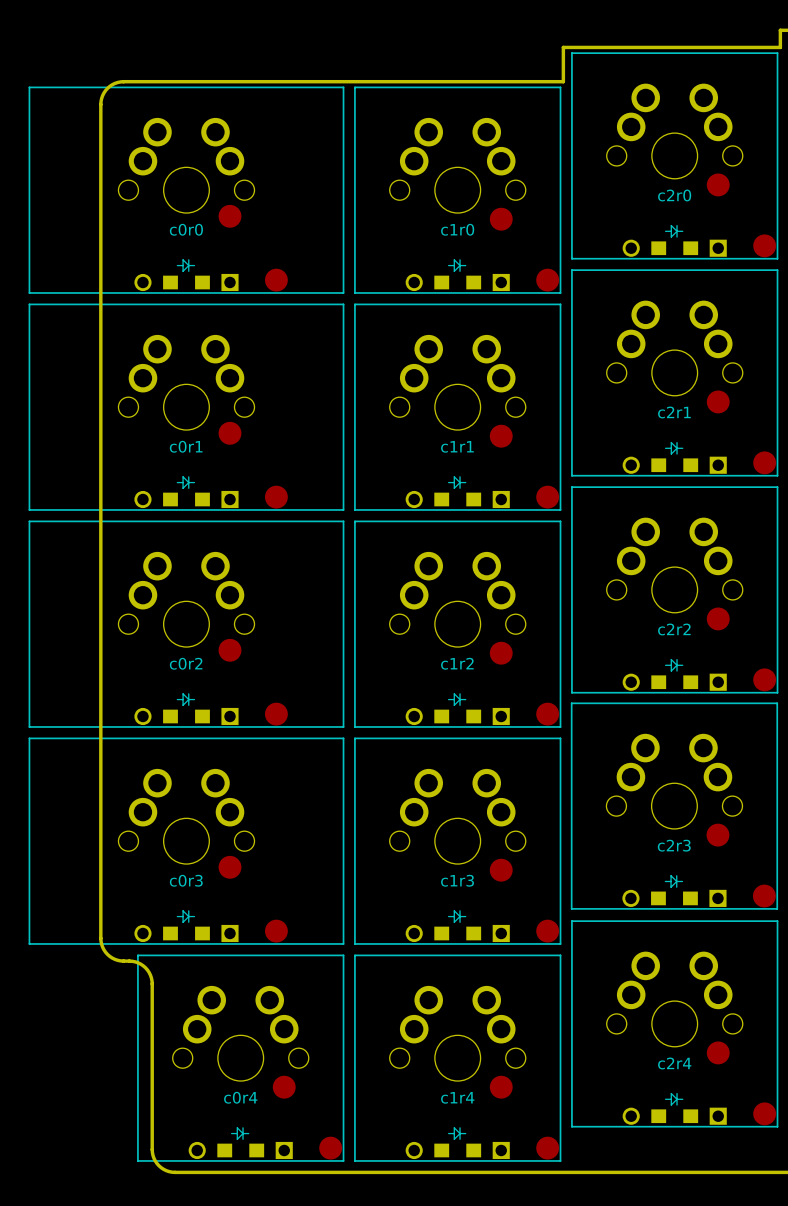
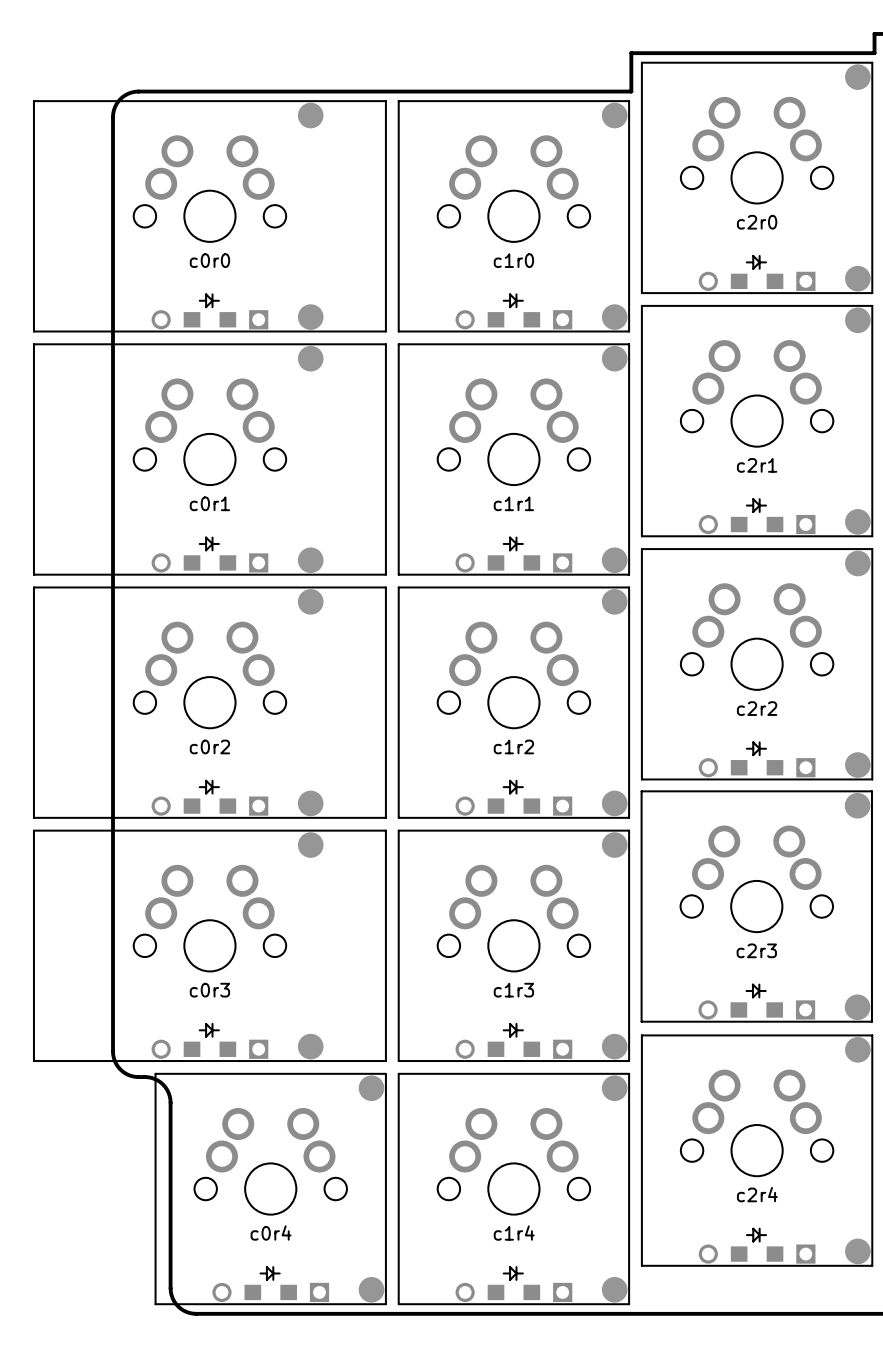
c2r0 footprint: [571, 52, 779, 260] -> [640, 61, 874, 295]
c0r0 footprint: [28, 86, 345, 294] -> [33, 100, 387, 333]
c1r0 footprint: [354, 86, 562, 294] -> [397, 100, 631, 333]
c2r1 footprint: [571, 269, 779, 477] -> [640, 304, 874, 538]
c0r1 footprint: [28, 303, 345, 511] -> [33, 343, 387, 576]
c1r1 footprint: [354, 303, 562, 511] -> [397, 343, 631, 576]
c2r2 footprint: [571, 486, 779, 694] -> [640, 548, 874, 781]
c0r2 footprint: [28, 520, 345, 728] -> [33, 586, 387, 819]
c1r2 footprint: [354, 520, 562, 728] -> [397, 586, 631, 819]
c2r3 footprint: [570, 702, 779, 910] -> [640, 790, 873, 1023]
c0r3 footprint: [28, 737, 345, 945] -> [33, 829, 387, 1062]
c1r3 footprint: [354, 737, 562, 945] -> [397, 829, 631, 1062]
c2r4 footprint: [571, 920, 779, 1128] -> [640, 1034, 874, 1267]
c0r4 footprint: [137, 954, 345, 1162] -> [154, 1072, 387, 1306]
c1r4 footprint: [354, 954, 562, 1162] -> [397, 1072, 631, 1306]

